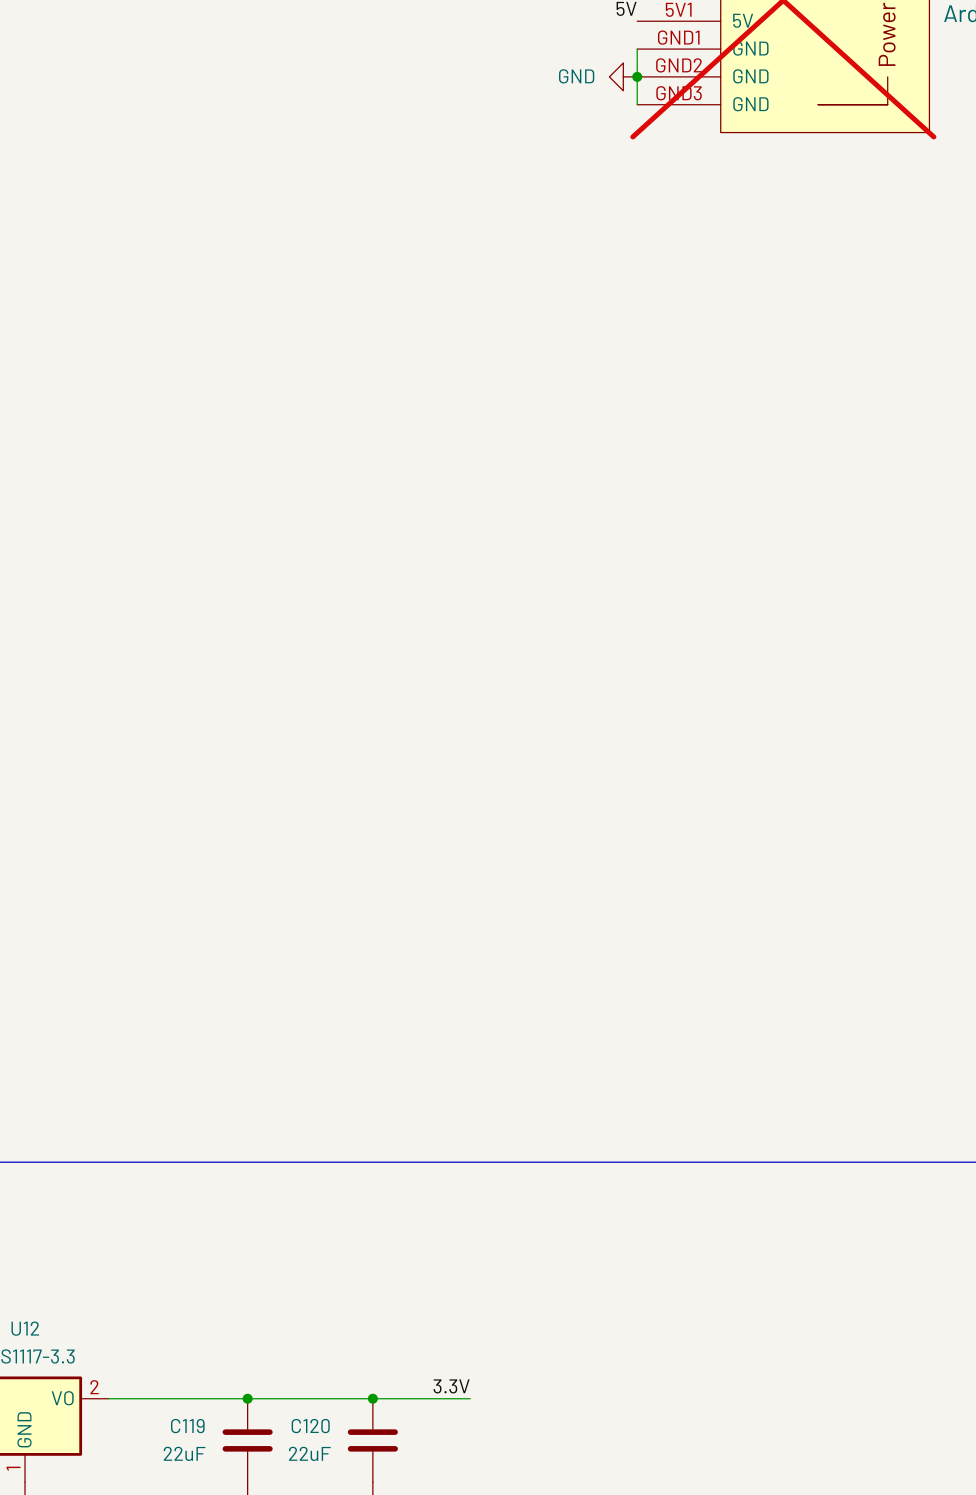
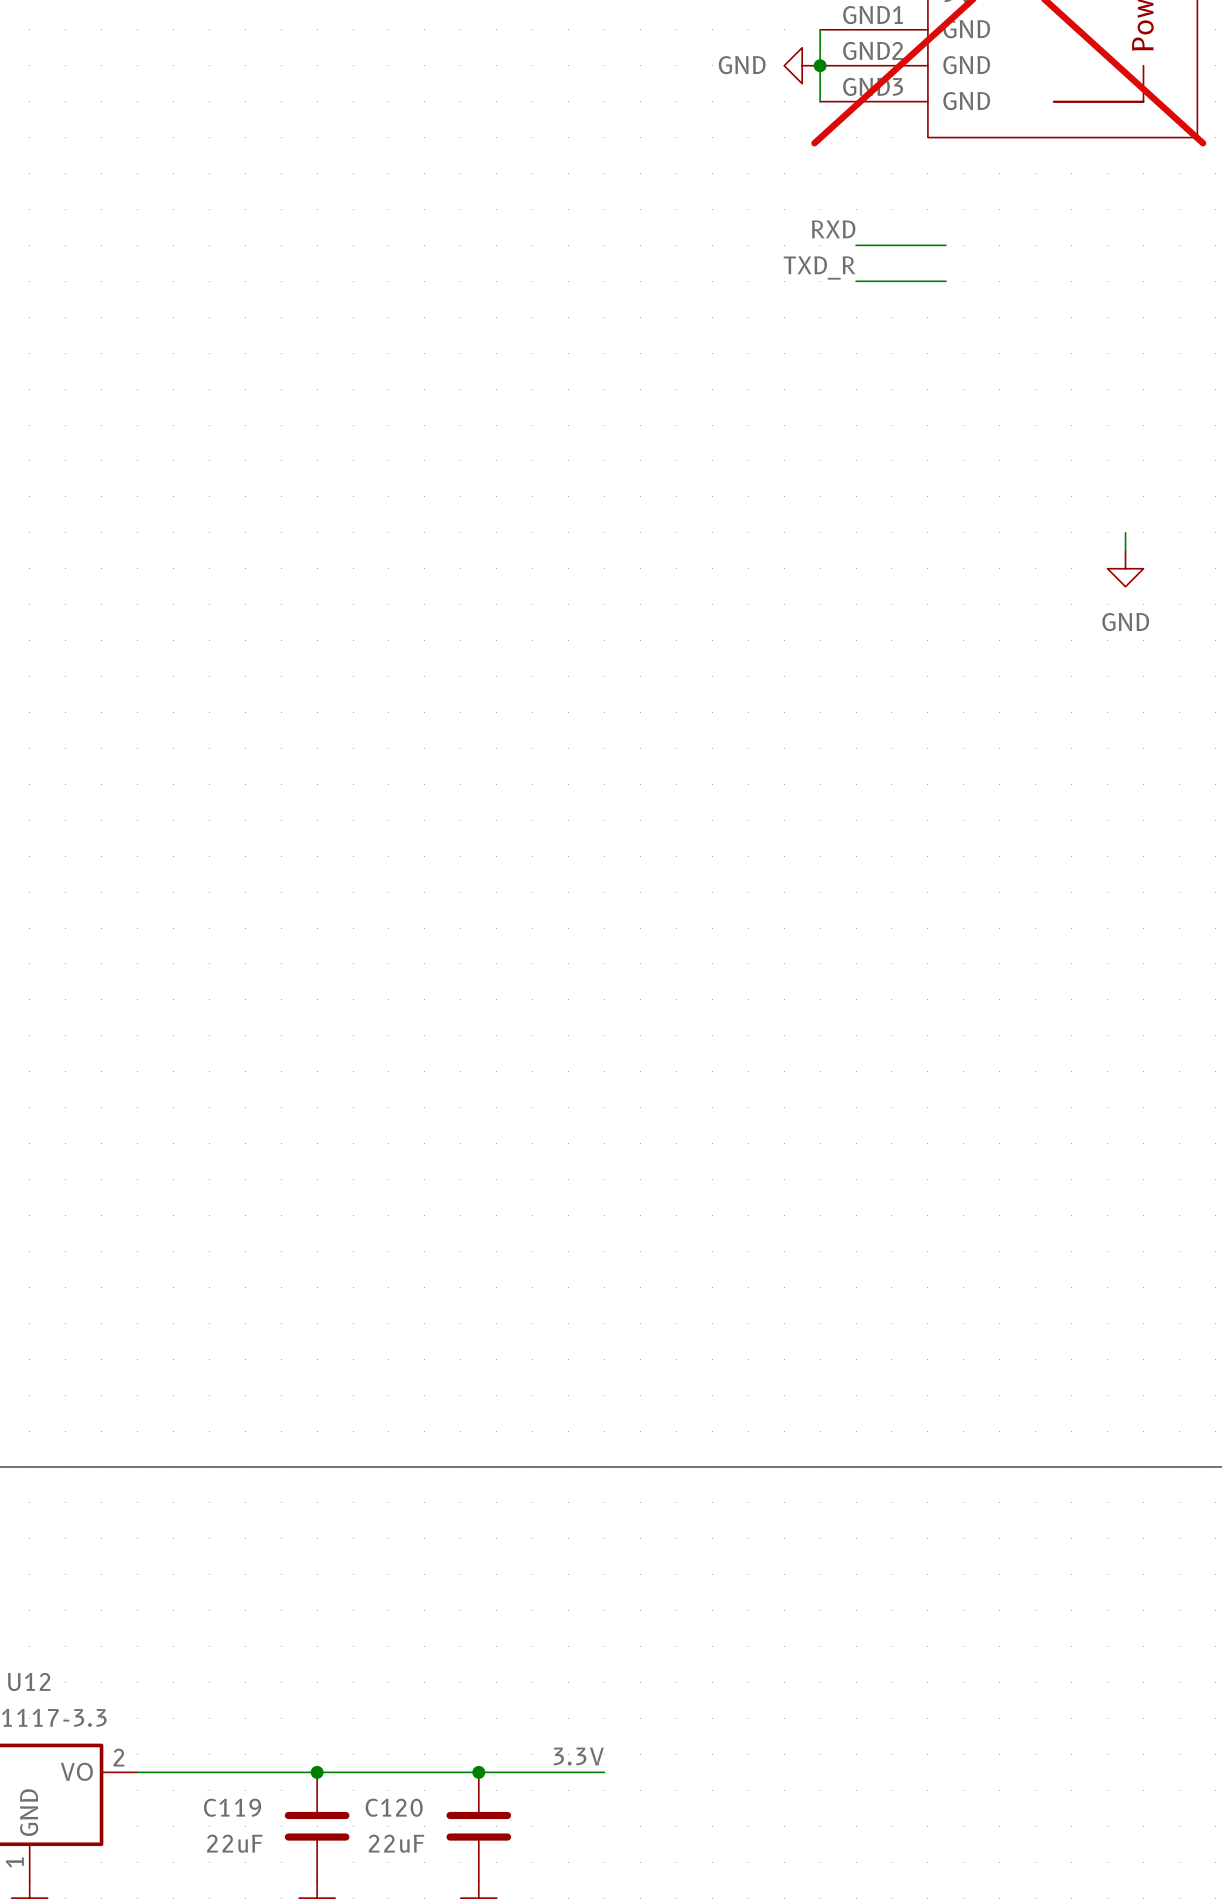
label: none -> RXD (833, 229)
wire: none -> (856, 245) (945, 245)
label: none -> TXD_R (819, 267)
wire: none -> (856, 281) (945, 281)
wire: none -> (1125, 532) (1125, 550)
power symbol: none -> GND (1125, 568)

